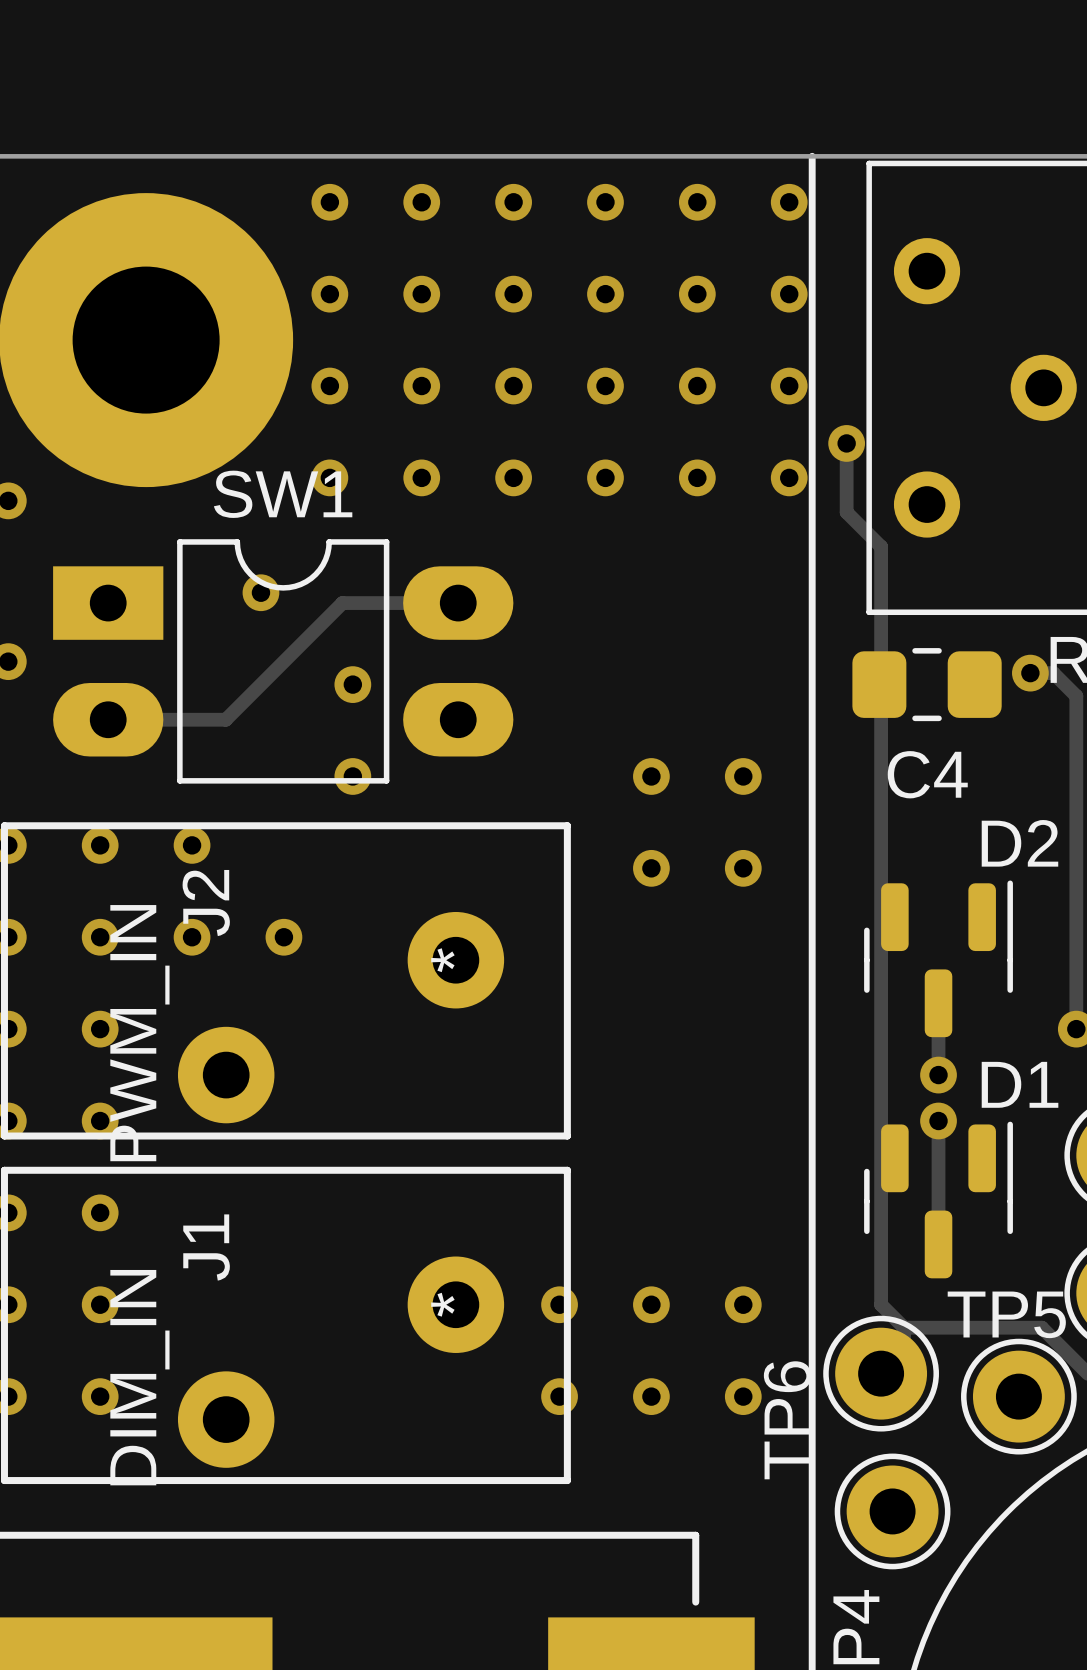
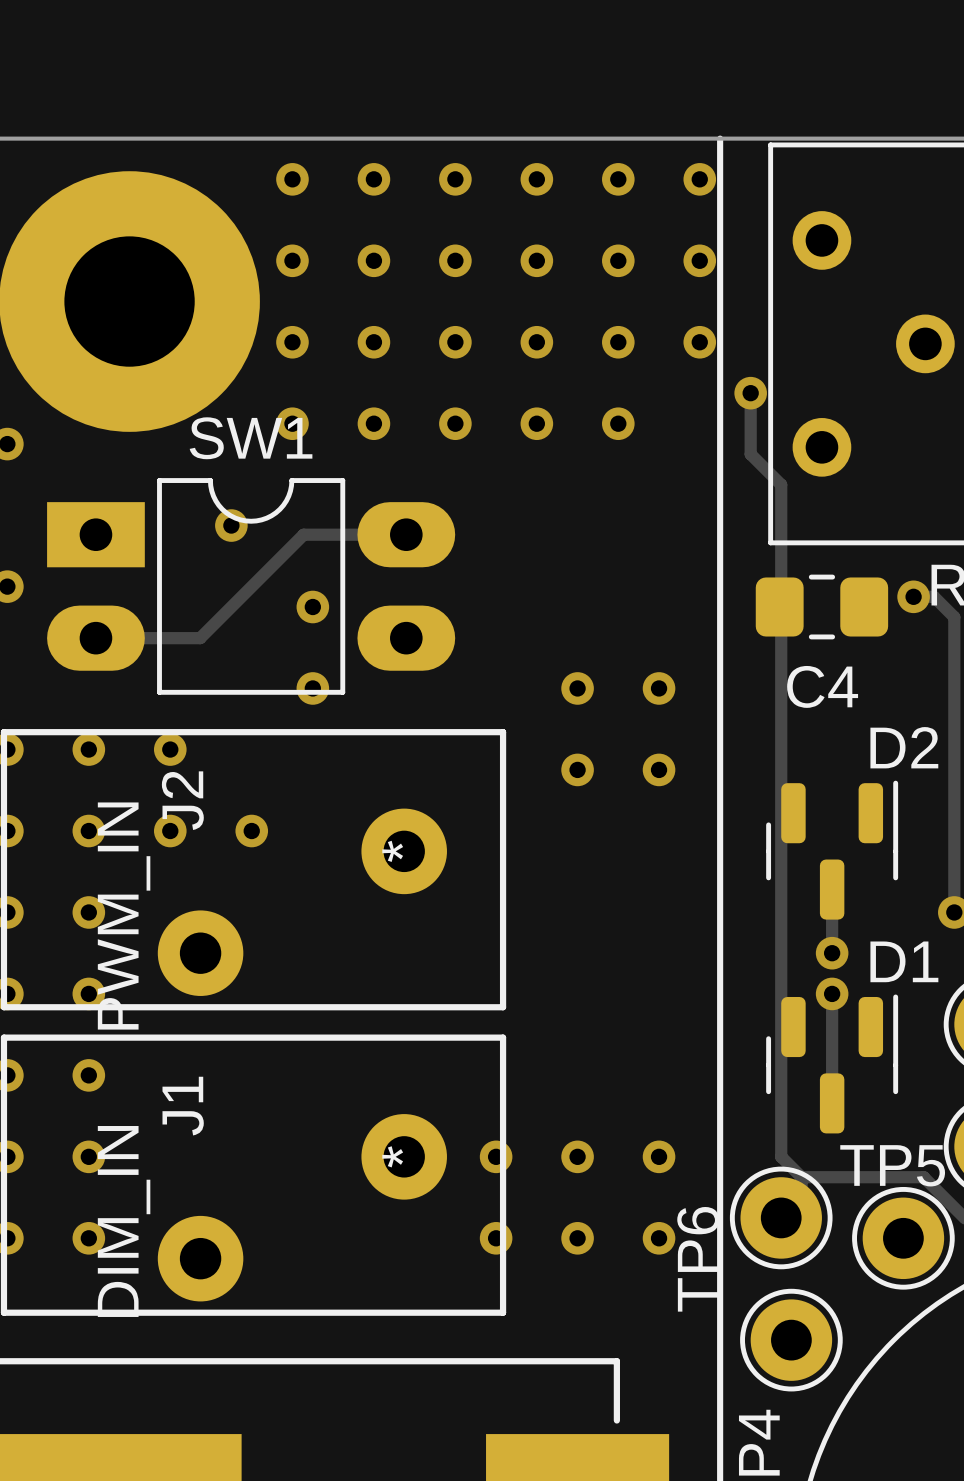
via: (789, 477) -> none

